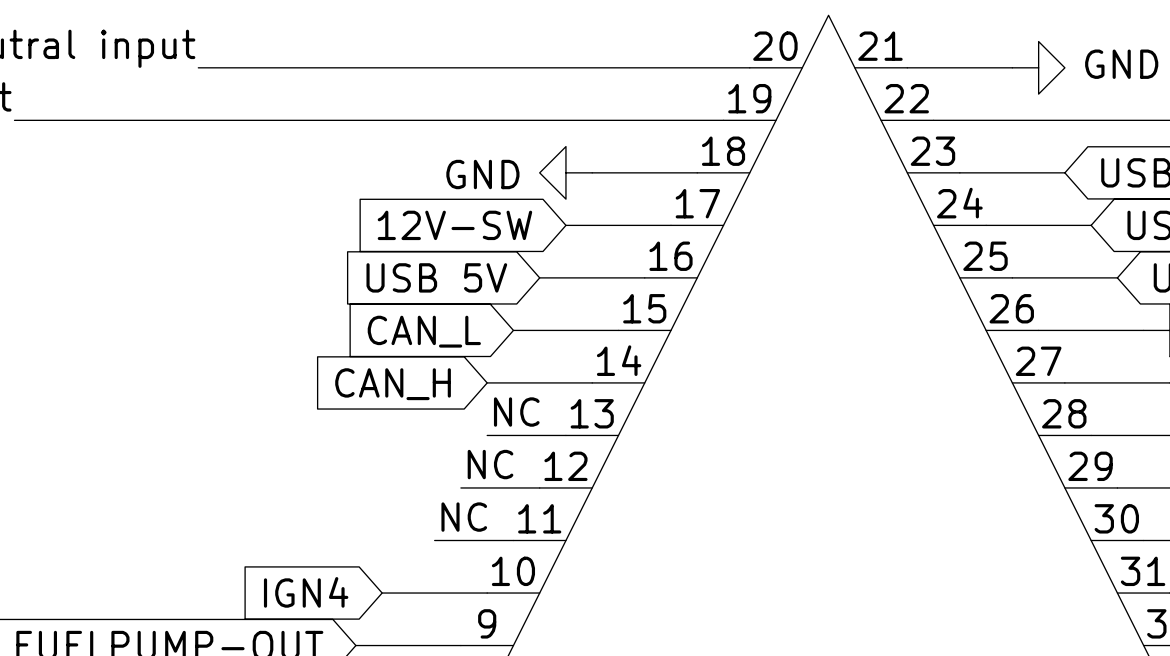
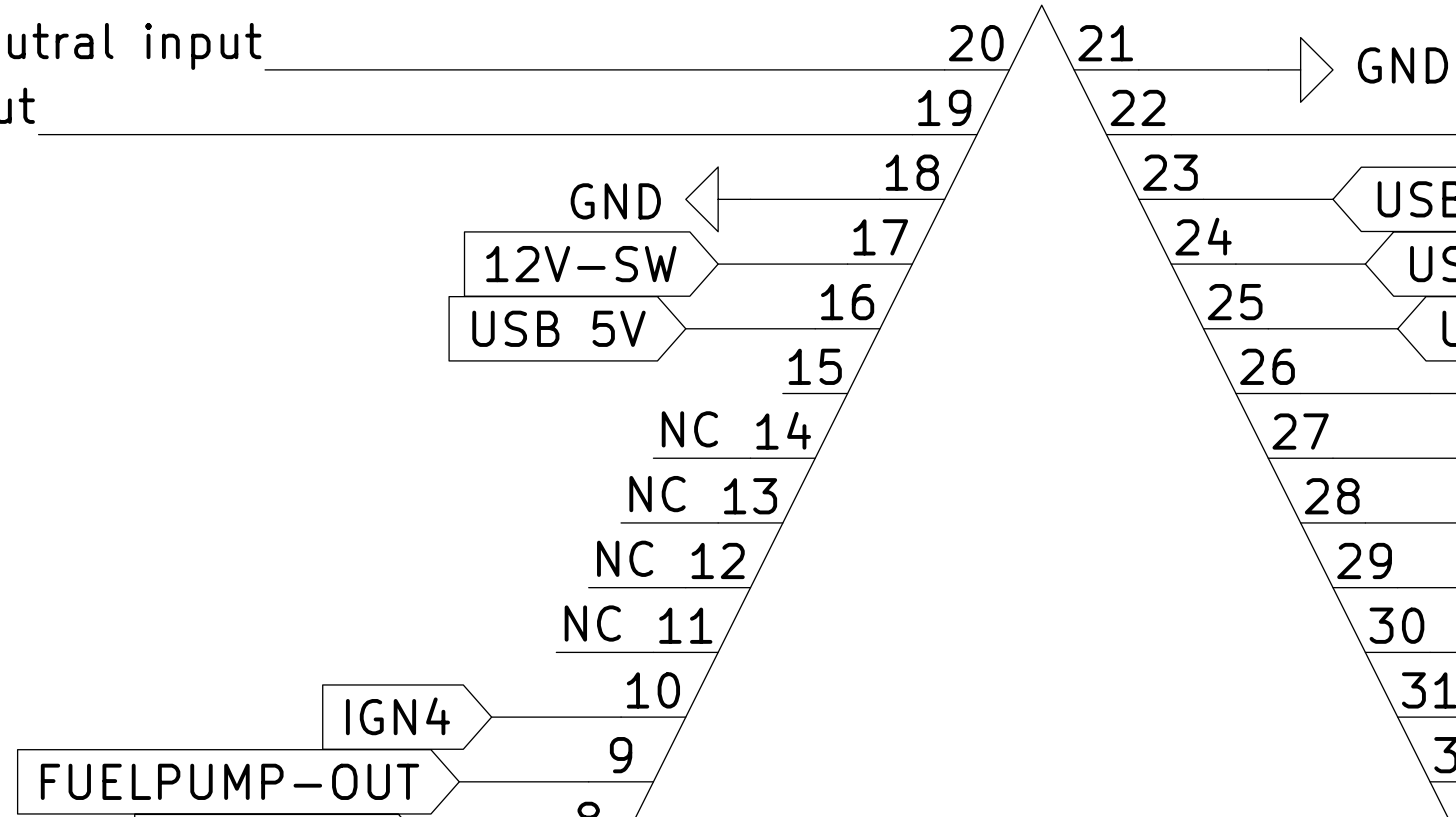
wire: (513, 330) (618, 330) -> none
global label: CAN_L (424, 331) -> none
label: none -> NC (689, 429)
wire: (487, 382) (513, 382) -> none
global label: CAN_H (393, 384) -> none

